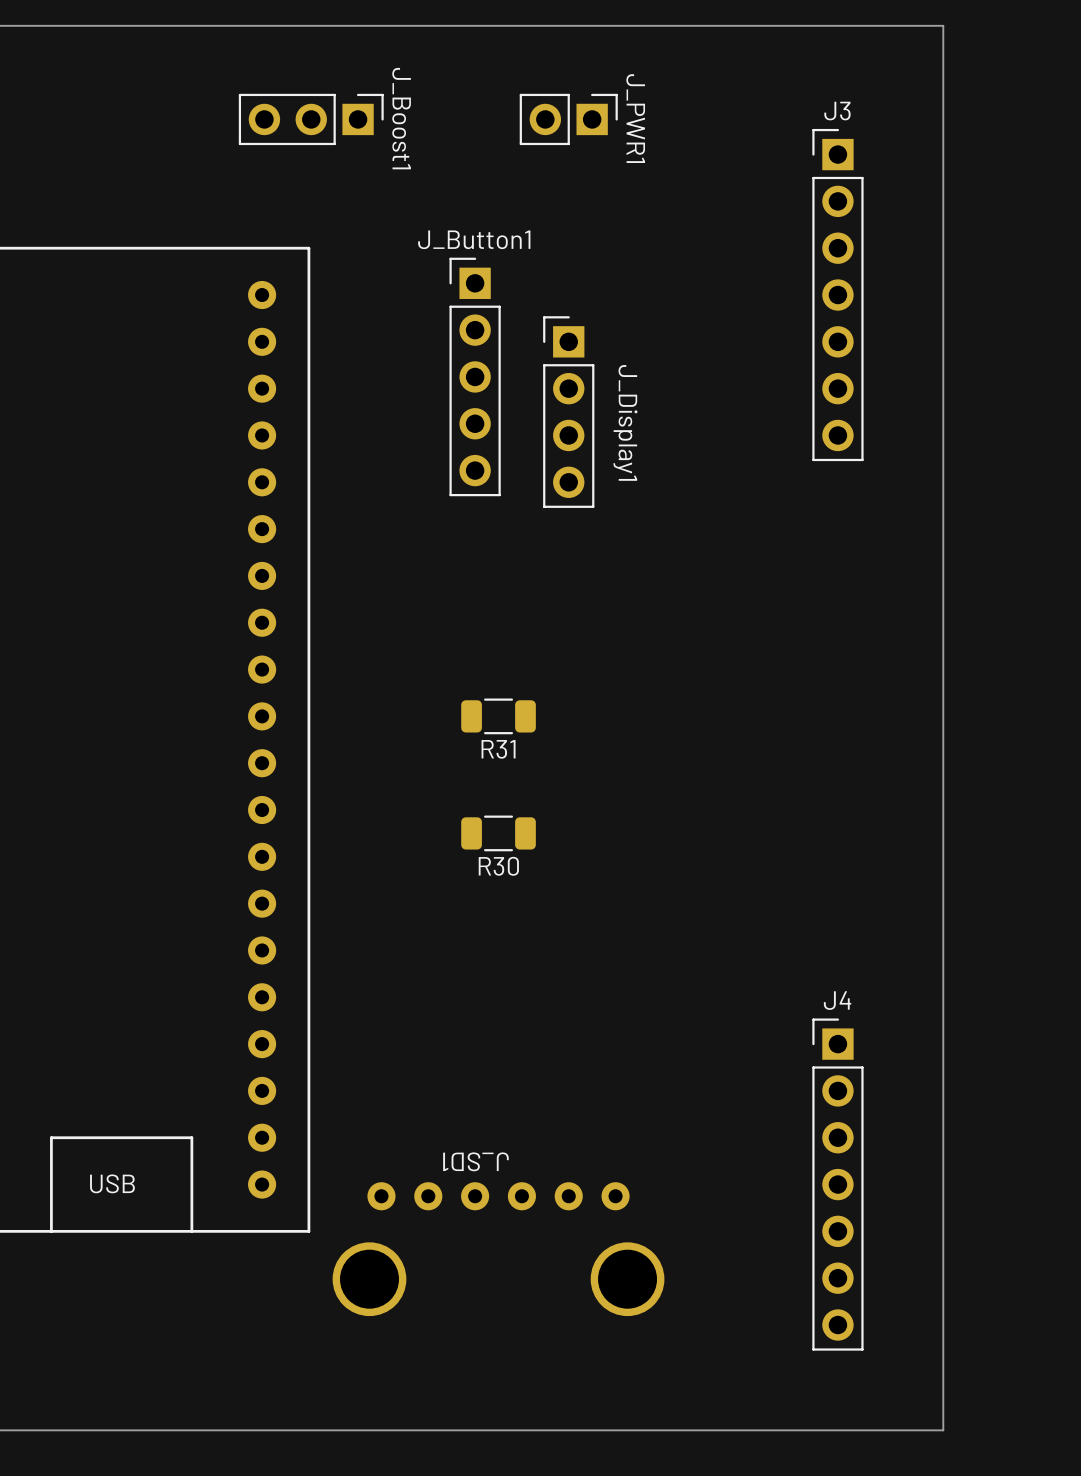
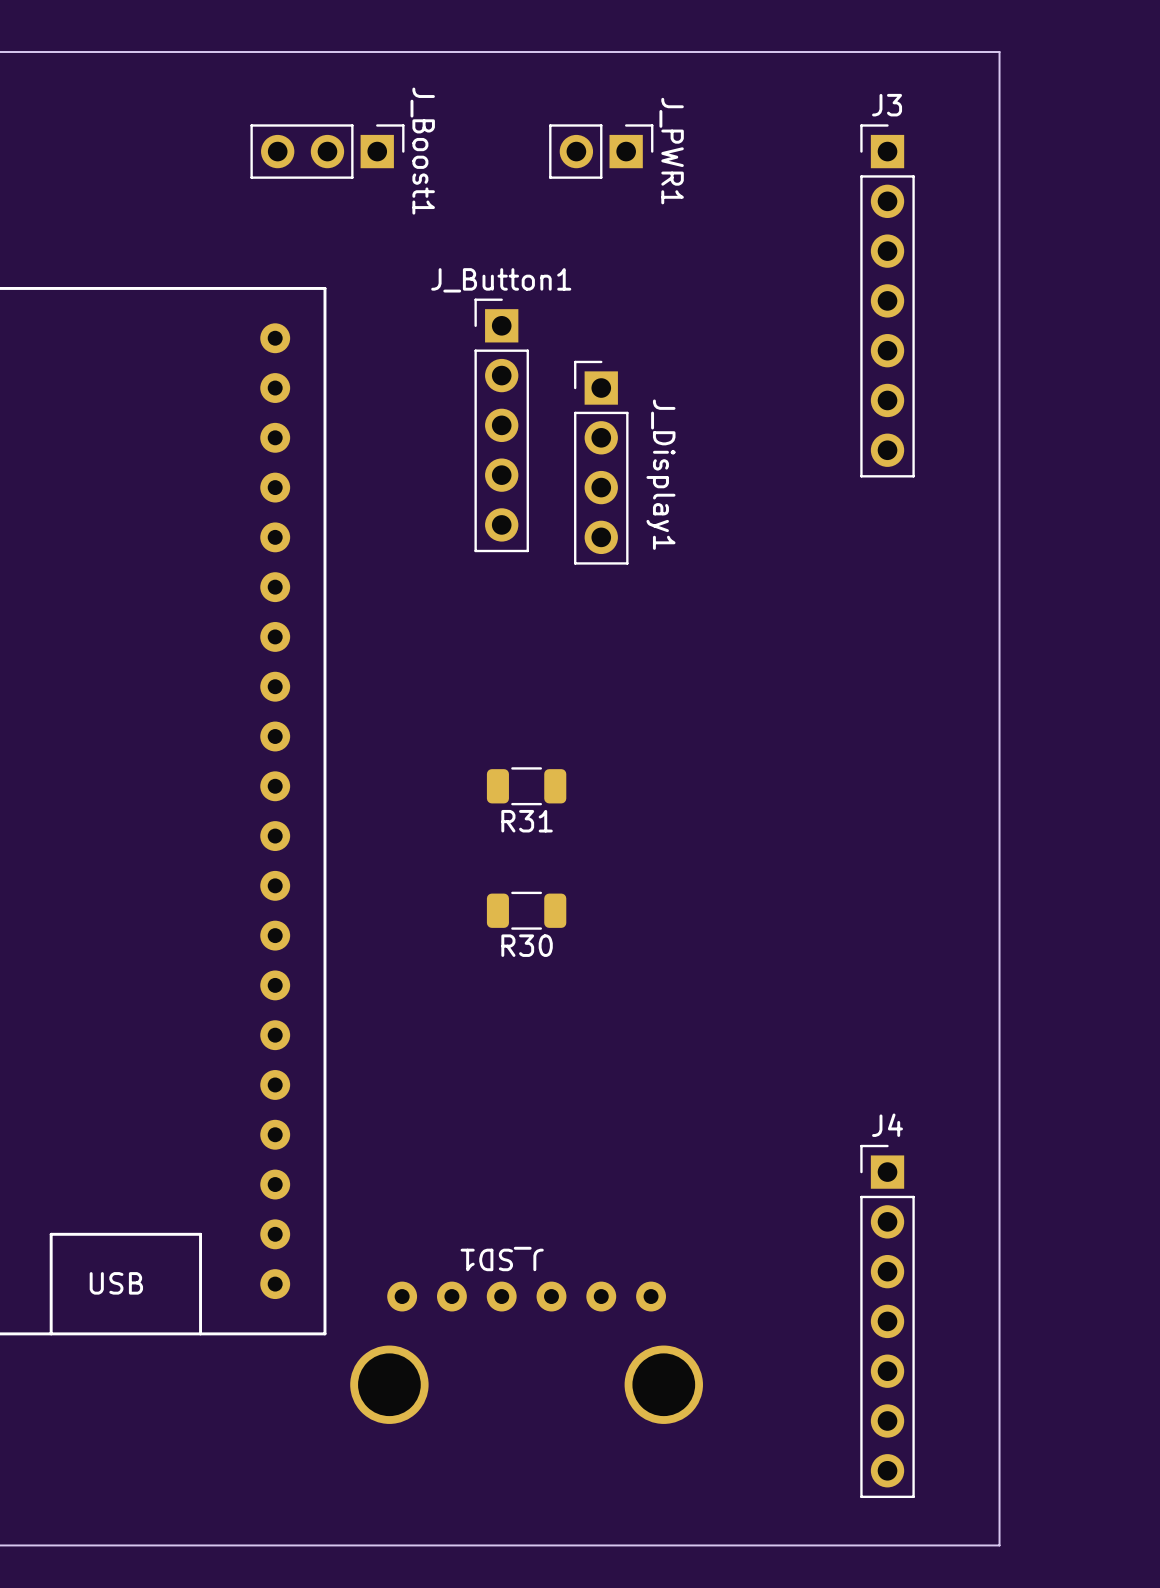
J3 position: (837, 295) -> (887, 300)
J4 position: (837, 1184) -> (887, 1321)

